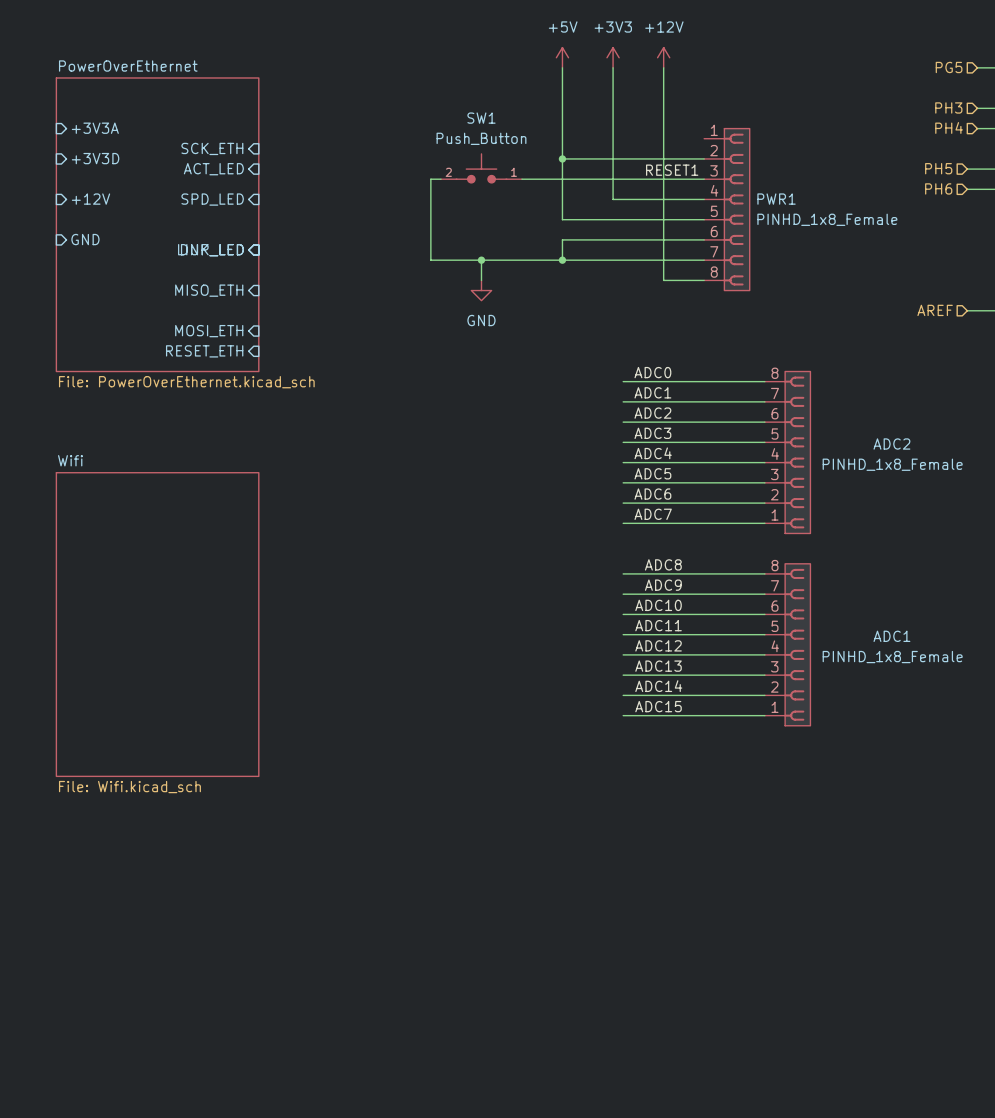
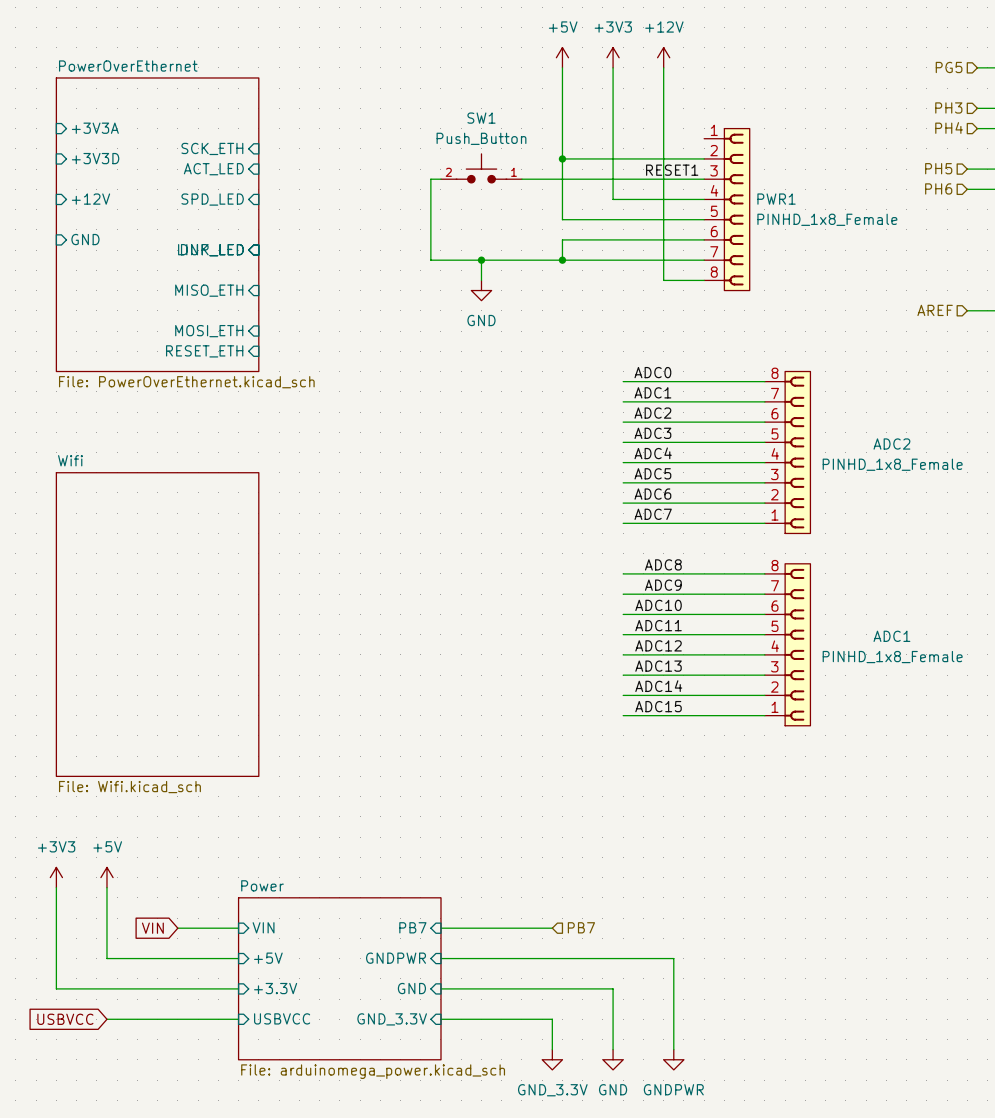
power symbol: none -> +3V3 (56, 877)
power symbol: none -> +5V (106, 877)
wire: none -> (56, 887) (56, 988) (238, 988)
wire: none -> (106, 887) (106, 958) (238, 958)
sheet pin: none -> VIN (263, 927)
sheet pin: none -> PB7 (412, 927)
hierarchical label: none -> PB7 (581, 927)
global label: none -> VIN (152, 928)
wire: none -> (177, 928) (238, 928)
wire: none -> (440, 928) (552, 928)
sheet pin: none -> +5V (268, 958)
sheet pin: none -> GNDPWR (396, 958)
wire: none -> (440, 958) (673, 958) (673, 1049)
sheet Power: none -> File: arduinomega_power.kicad_sch (339, 978)
sheet pin: none -> +3.3V (275, 988)
sheet pin: none -> GND (411, 988)
wire: none -> (440, 988) (613, 988) (613, 1049)
sheet pin: none -> USBVCC (282, 1018)
global label: none -> USBVCC (65, 1019)
wire: none -> (106, 1019) (238, 1019)
sheet pin: none -> GND_3.3V (392, 1019)
wire: none -> (440, 1019) (552, 1019) (552, 1049)
power symbol: none -> GND_3.3V (552, 1059)
power symbol: none -> GND (613, 1059)
power symbol: none -> GNDPWR (673, 1059)

